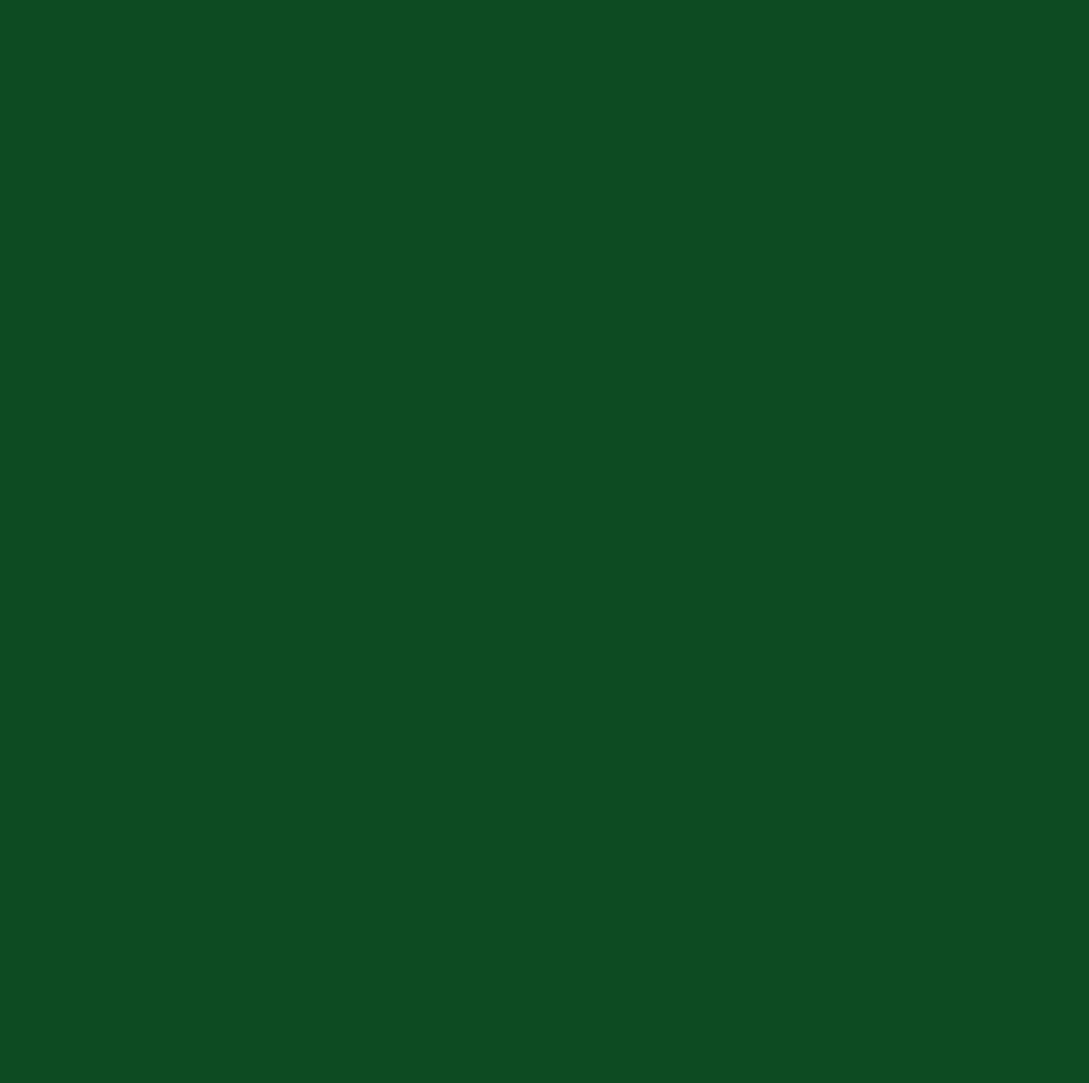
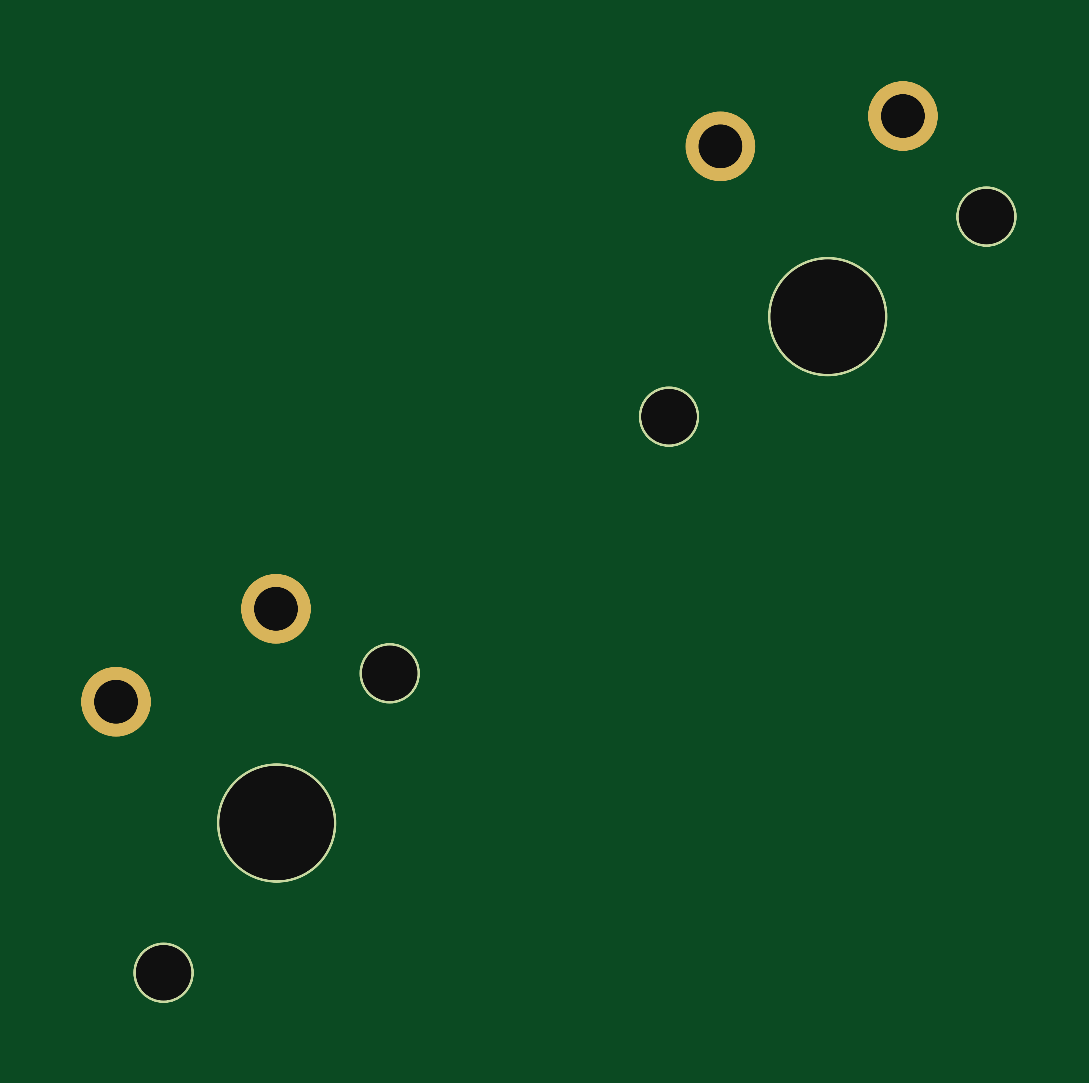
part: none -> (827, 263)
part: none -> (827, 263)
part: none -> (250, 787)
part: none -> (250, 787)

